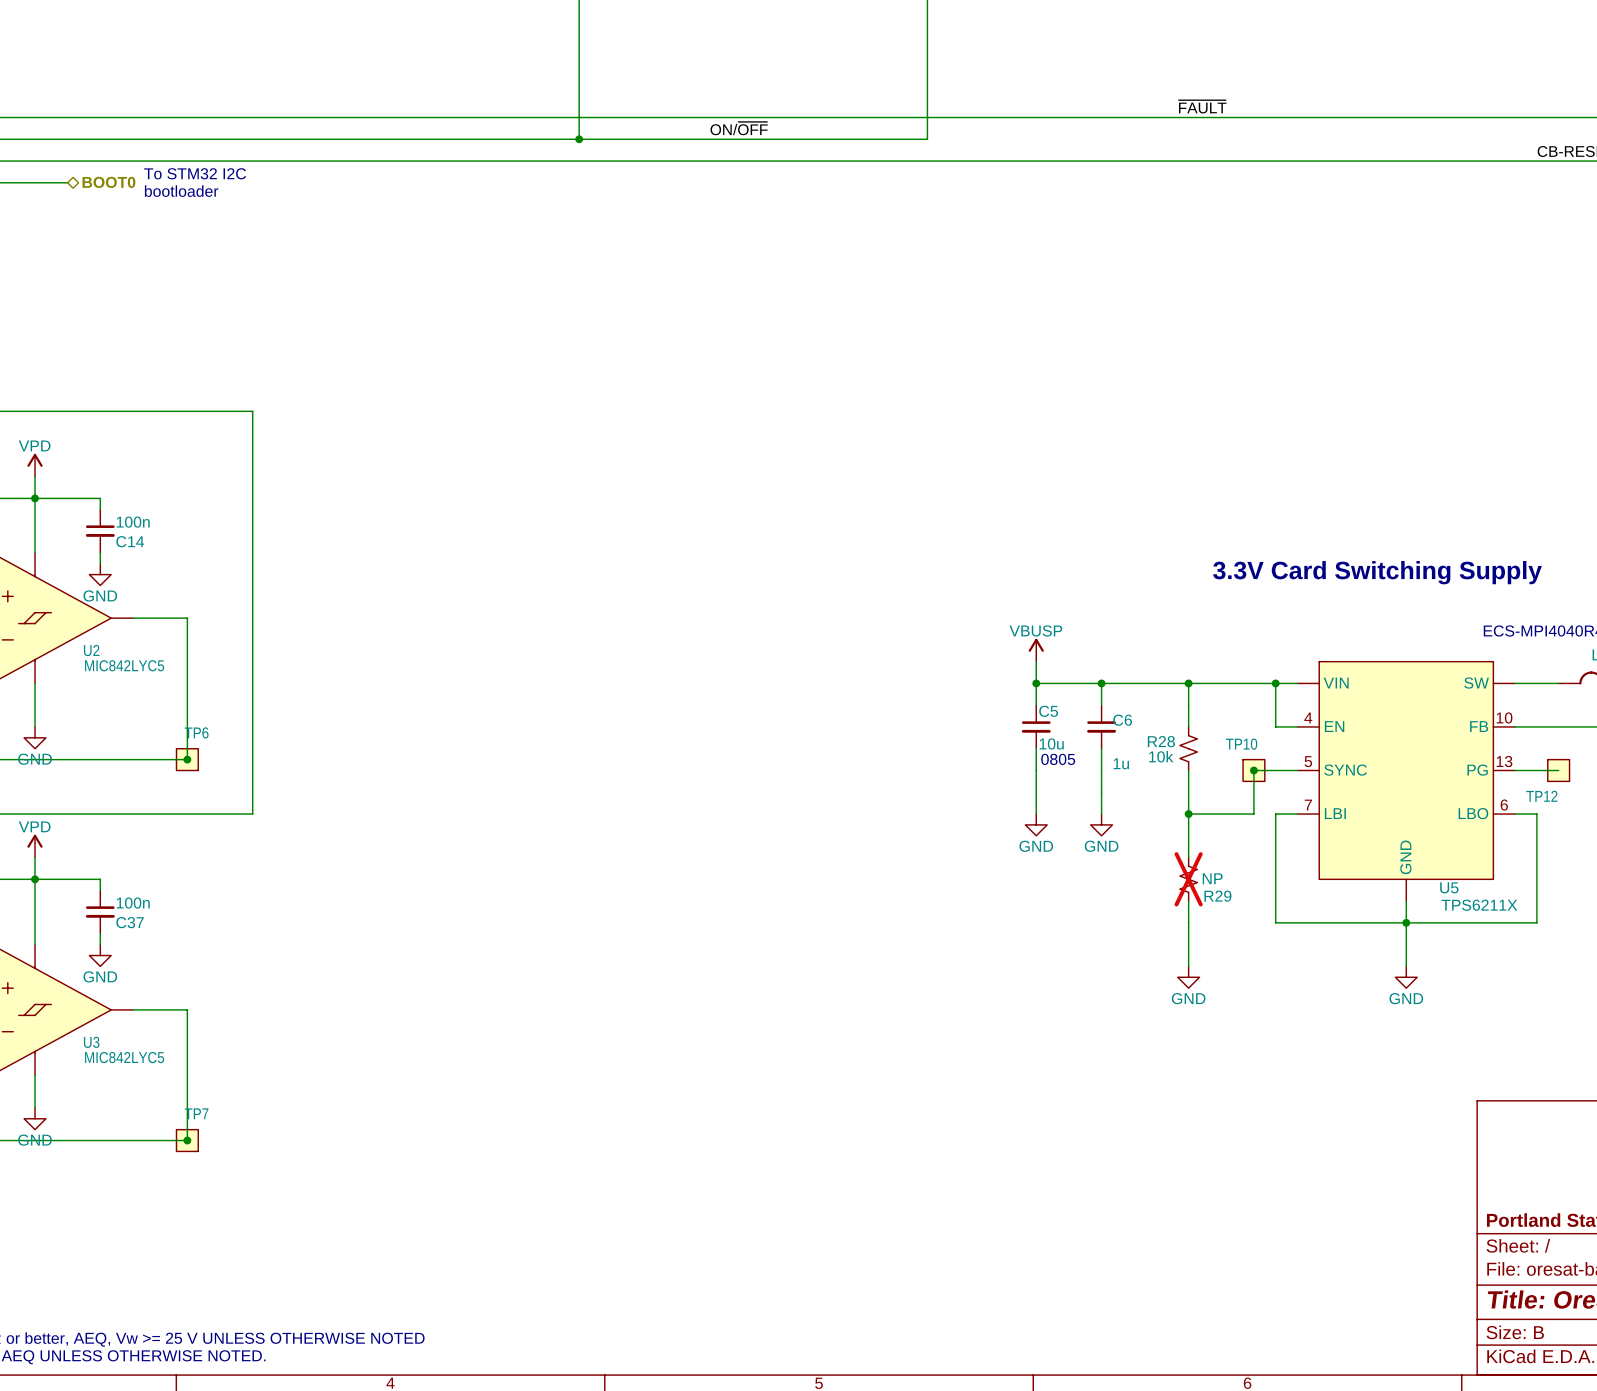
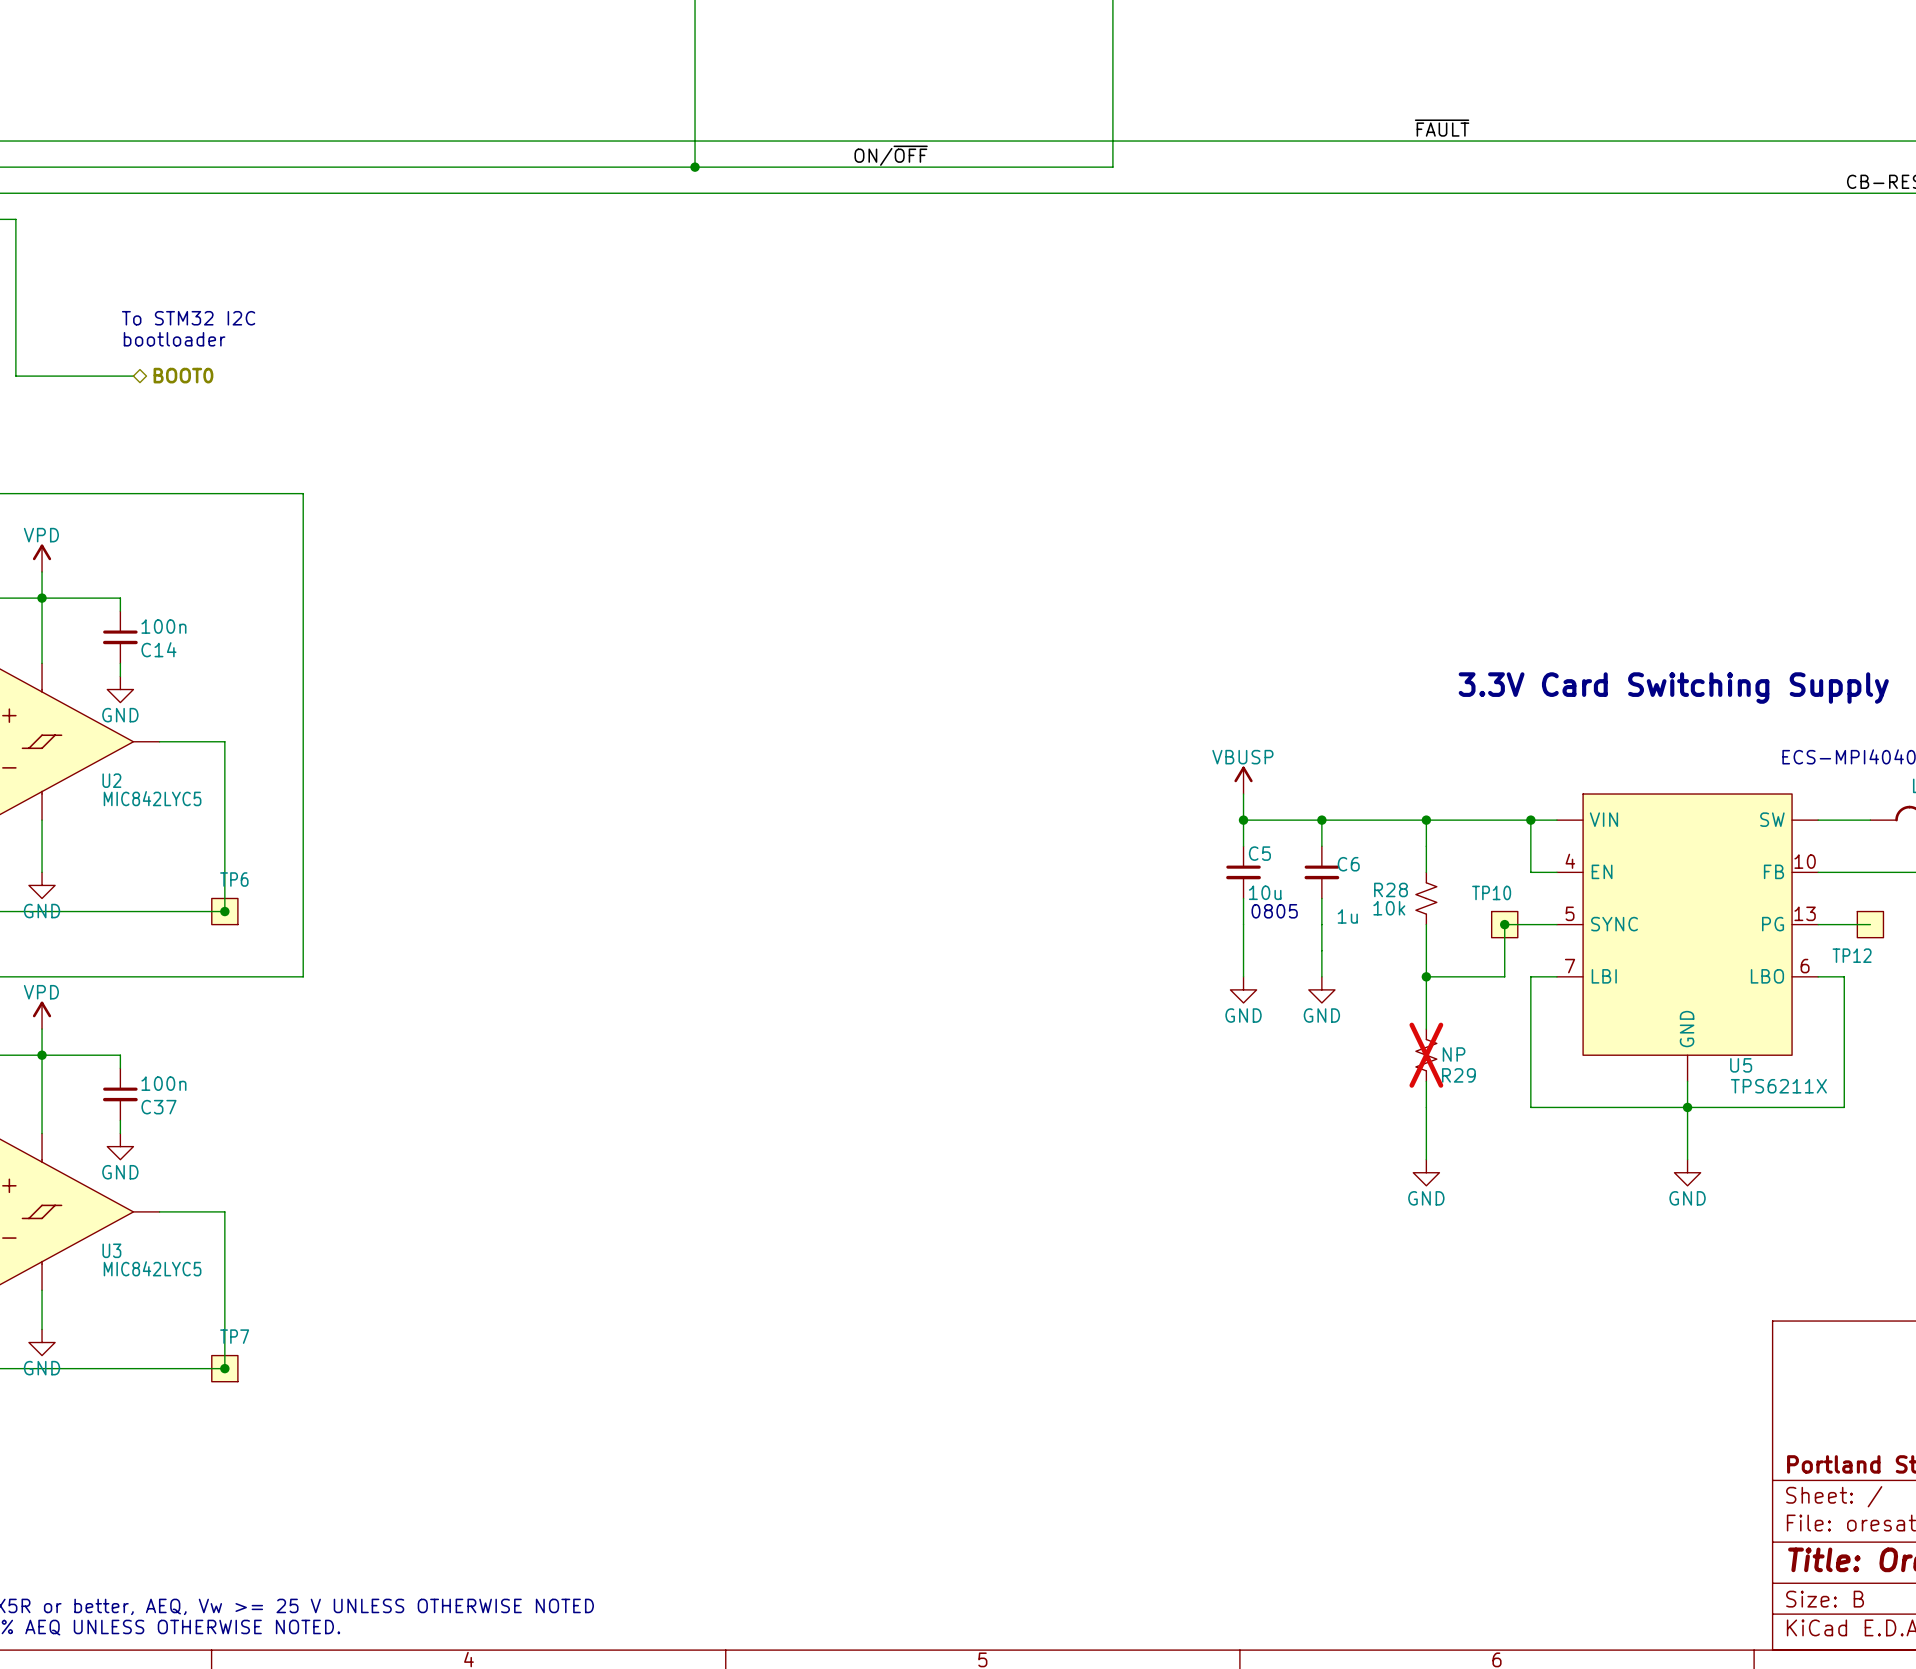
text position: To STM32 I2C (195, 173) -> To STM32 I2C (188, 318)
wire: (13, 182) (67, 182) -> (15, 219) (15, 376) (133, 376)
hierarchical label position: BOOT0 (108, 182) -> BOOT0 (183, 375)
text position: bootloader (181, 191) -> bootloader (174, 339)

